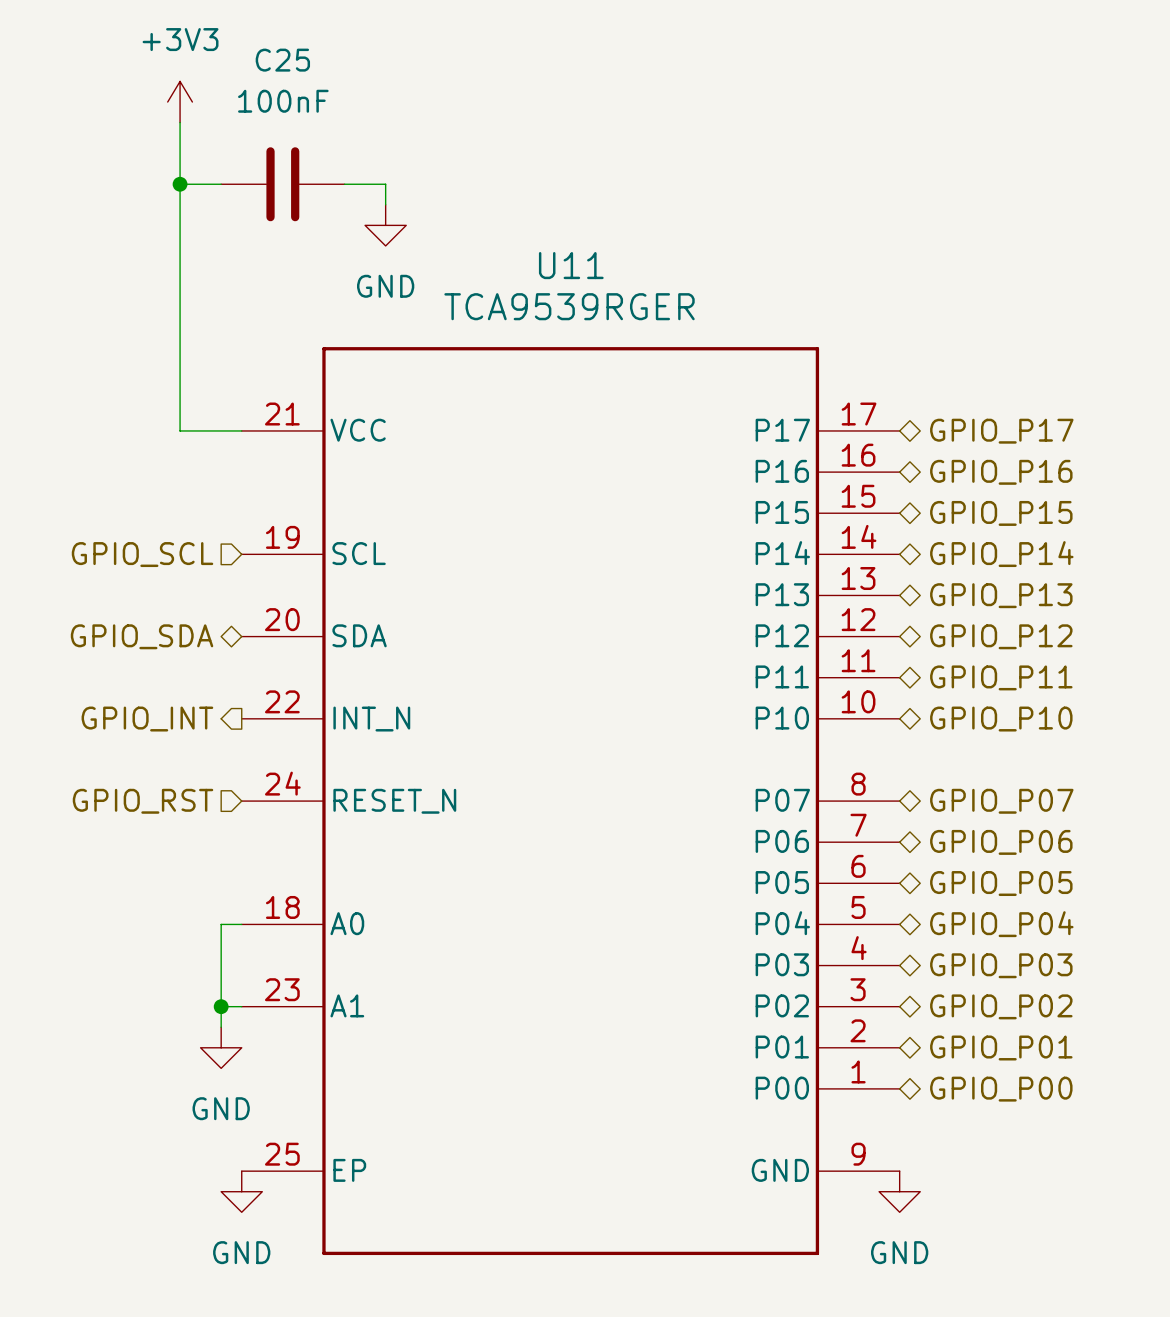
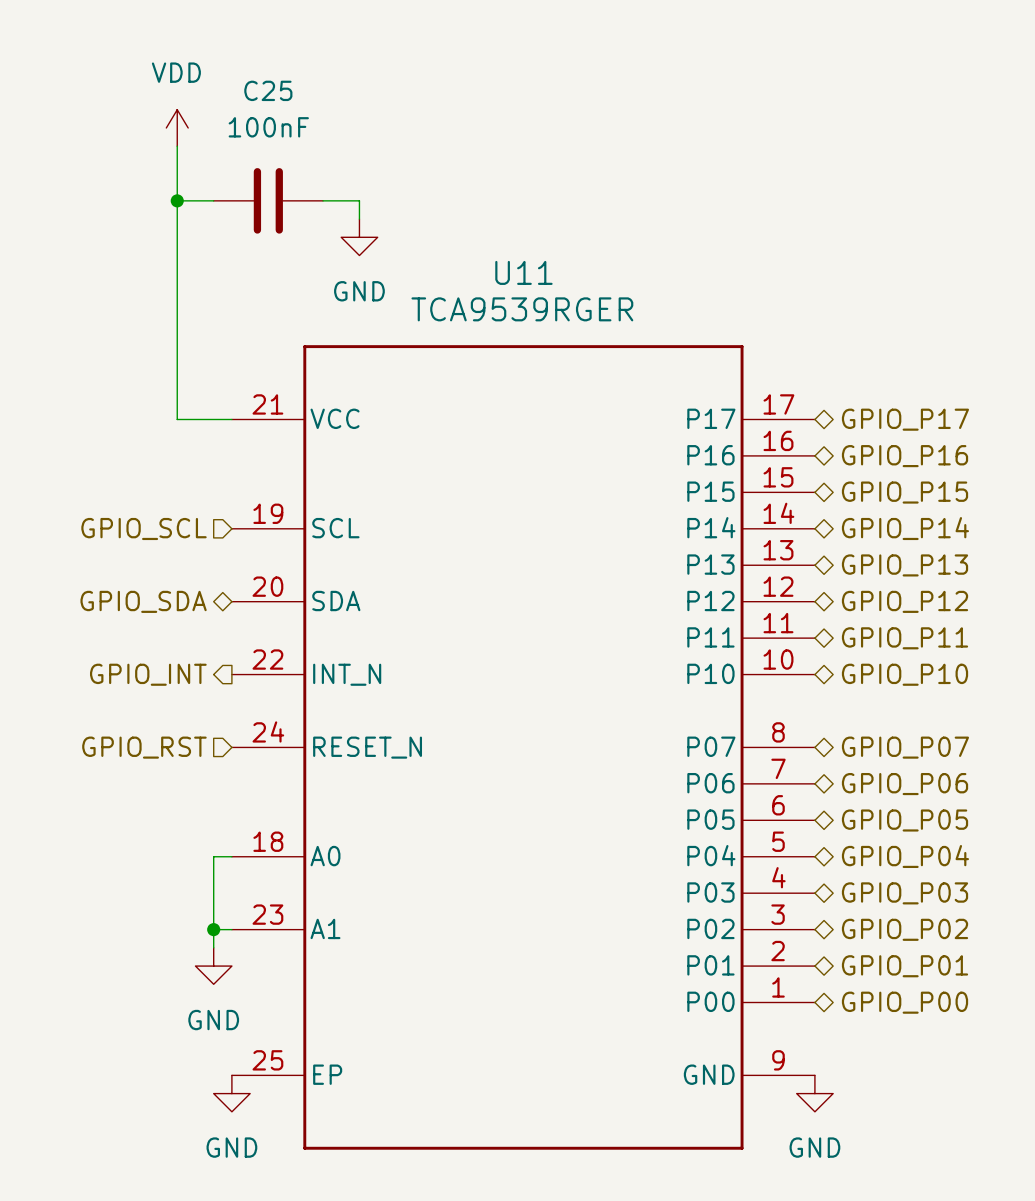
power symbol: +3V3 (180, 102) -> VDD (177, 127)

